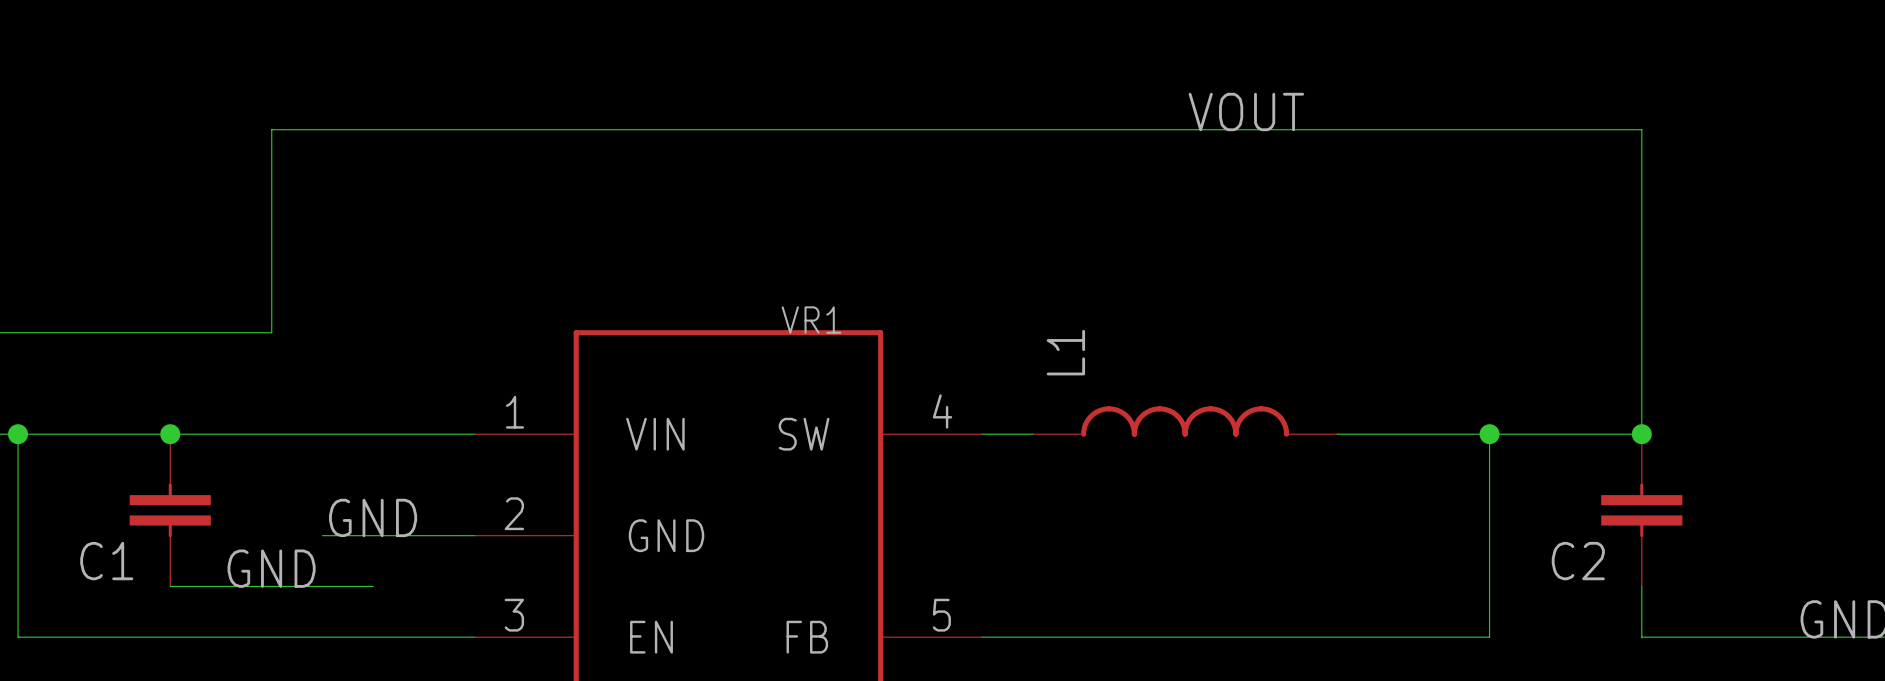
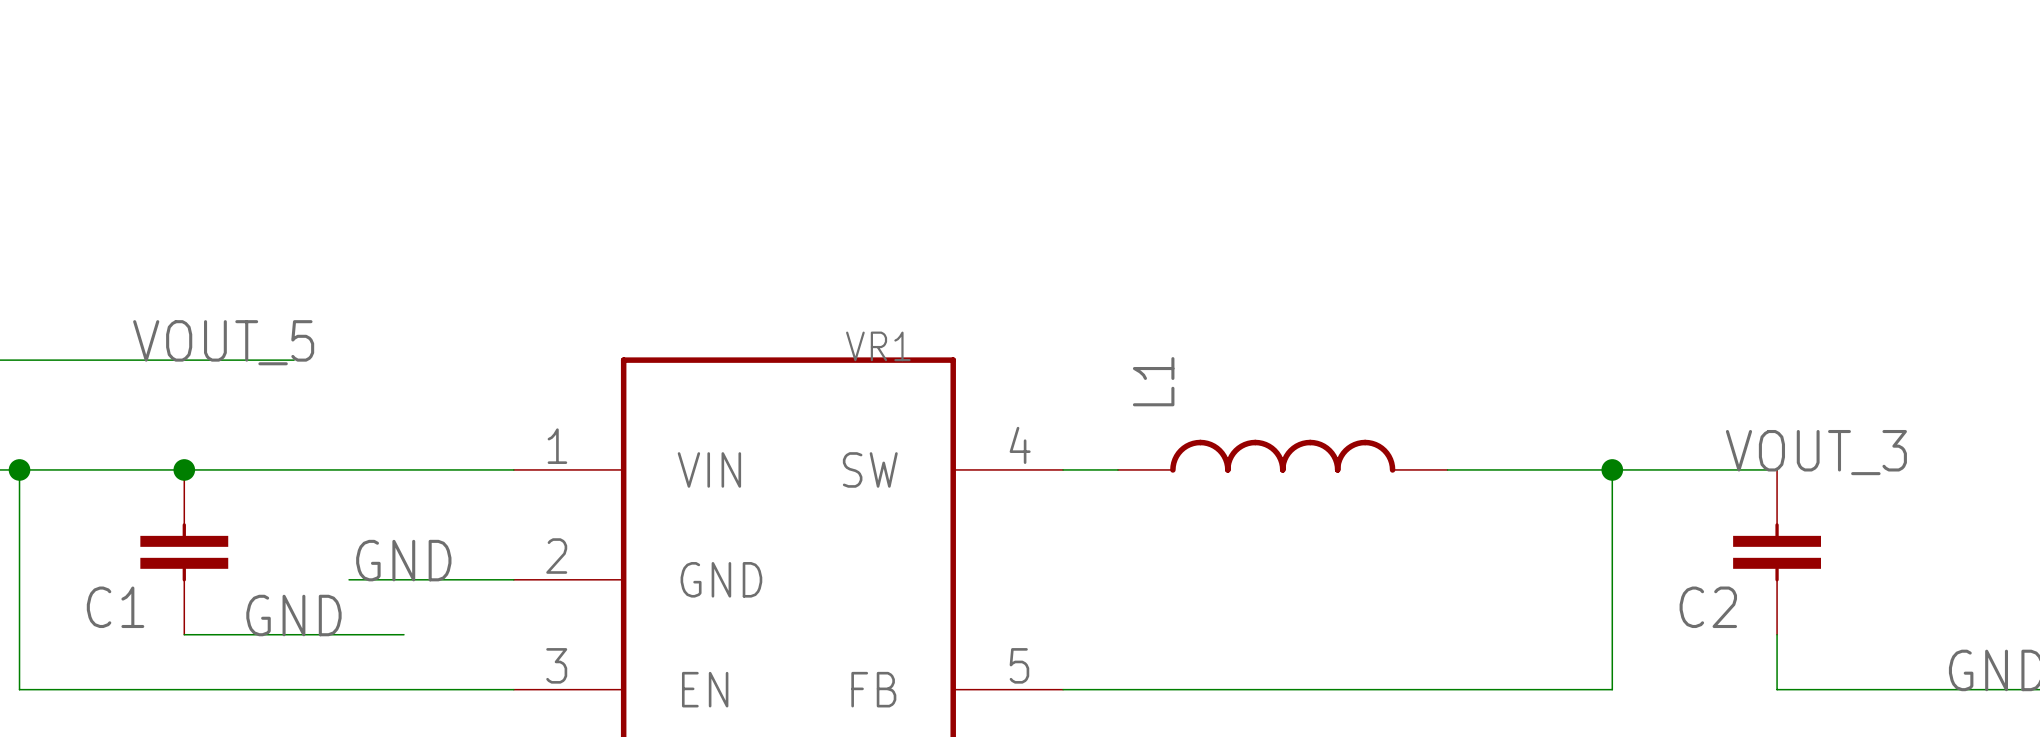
label: VOUT (1246, 111) -> none
label: none -> VOUT_5 (223, 342)
wire: (271, 332) (271, 129) (1641, 129) (1641, 434) -> none
label: none -> VOUT_3 (1816, 452)
junction: (1641, 434) -> none

